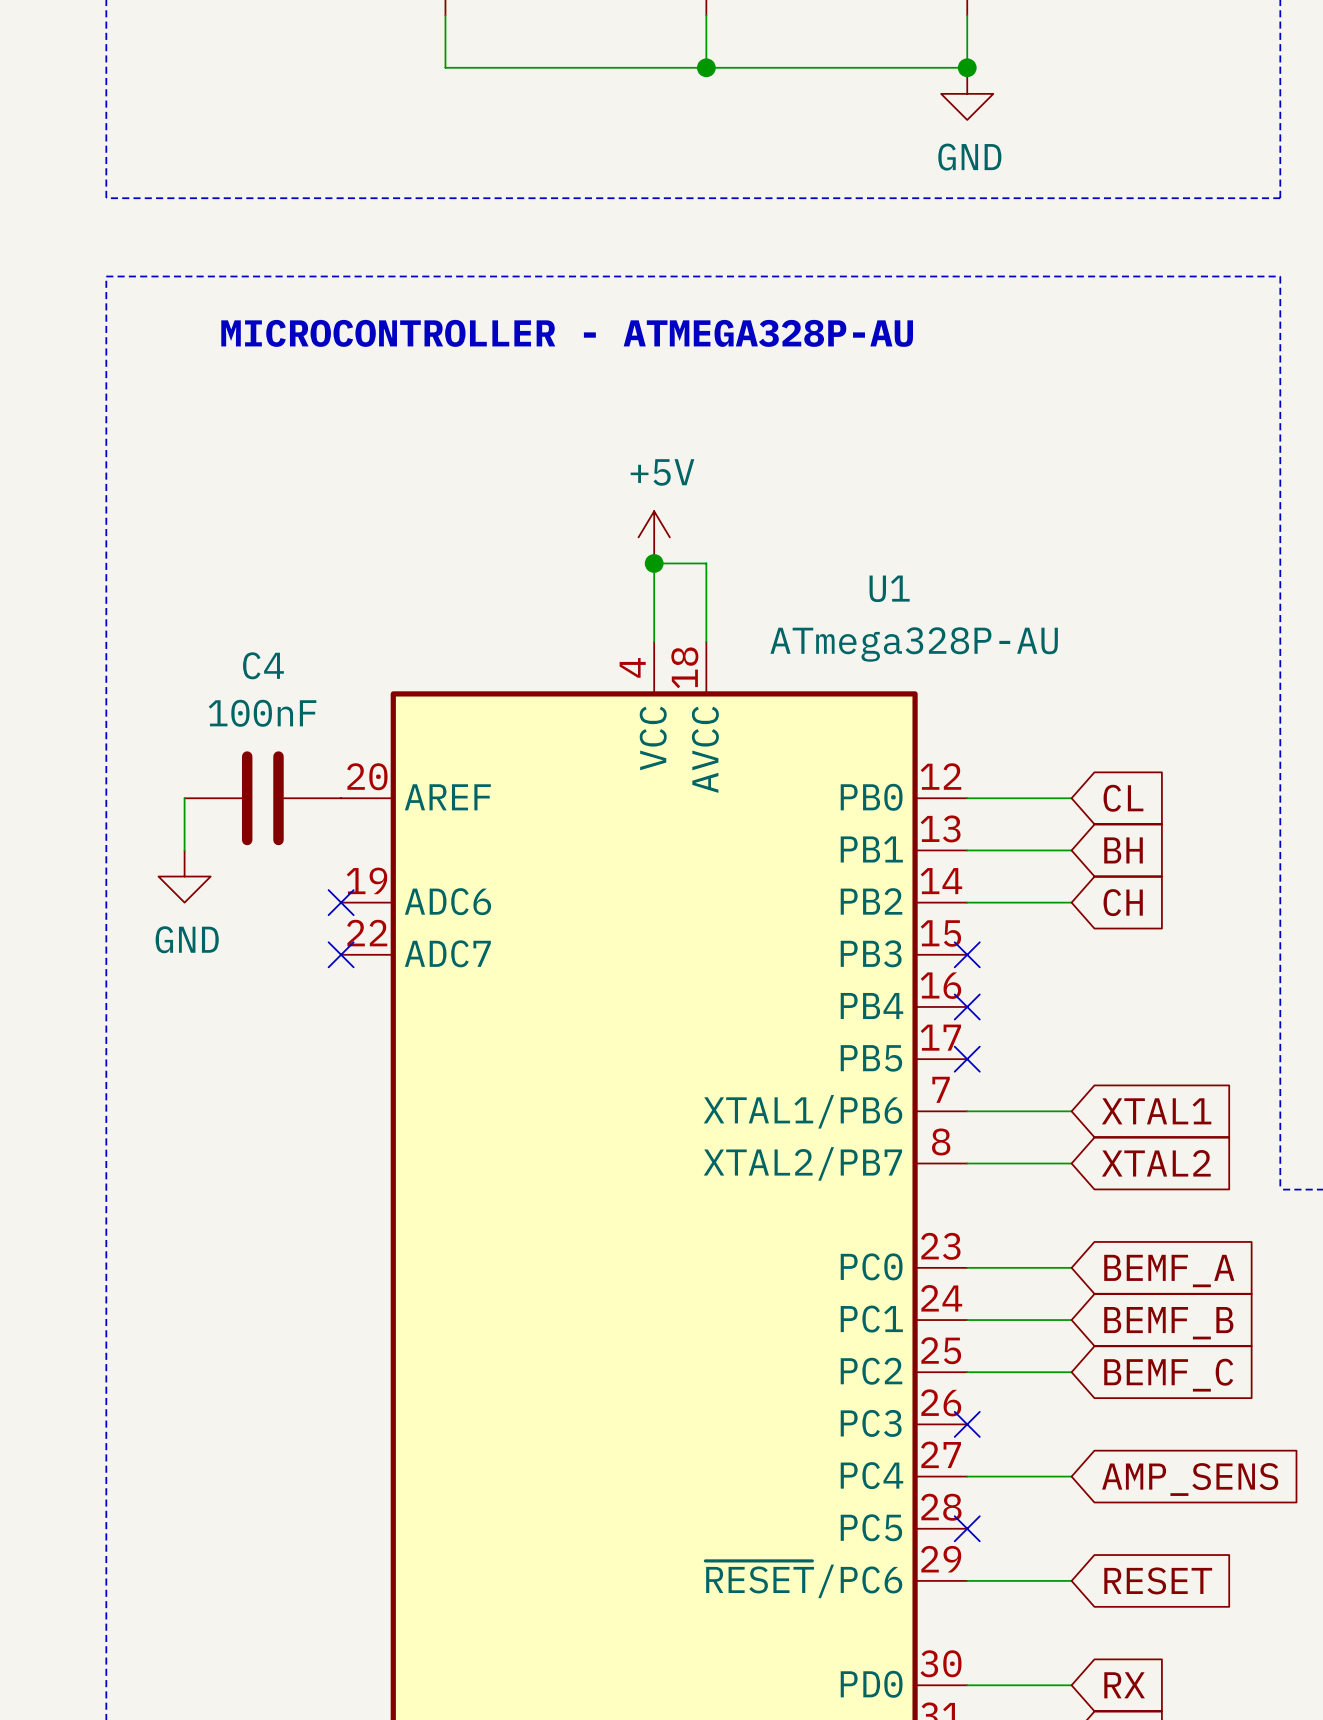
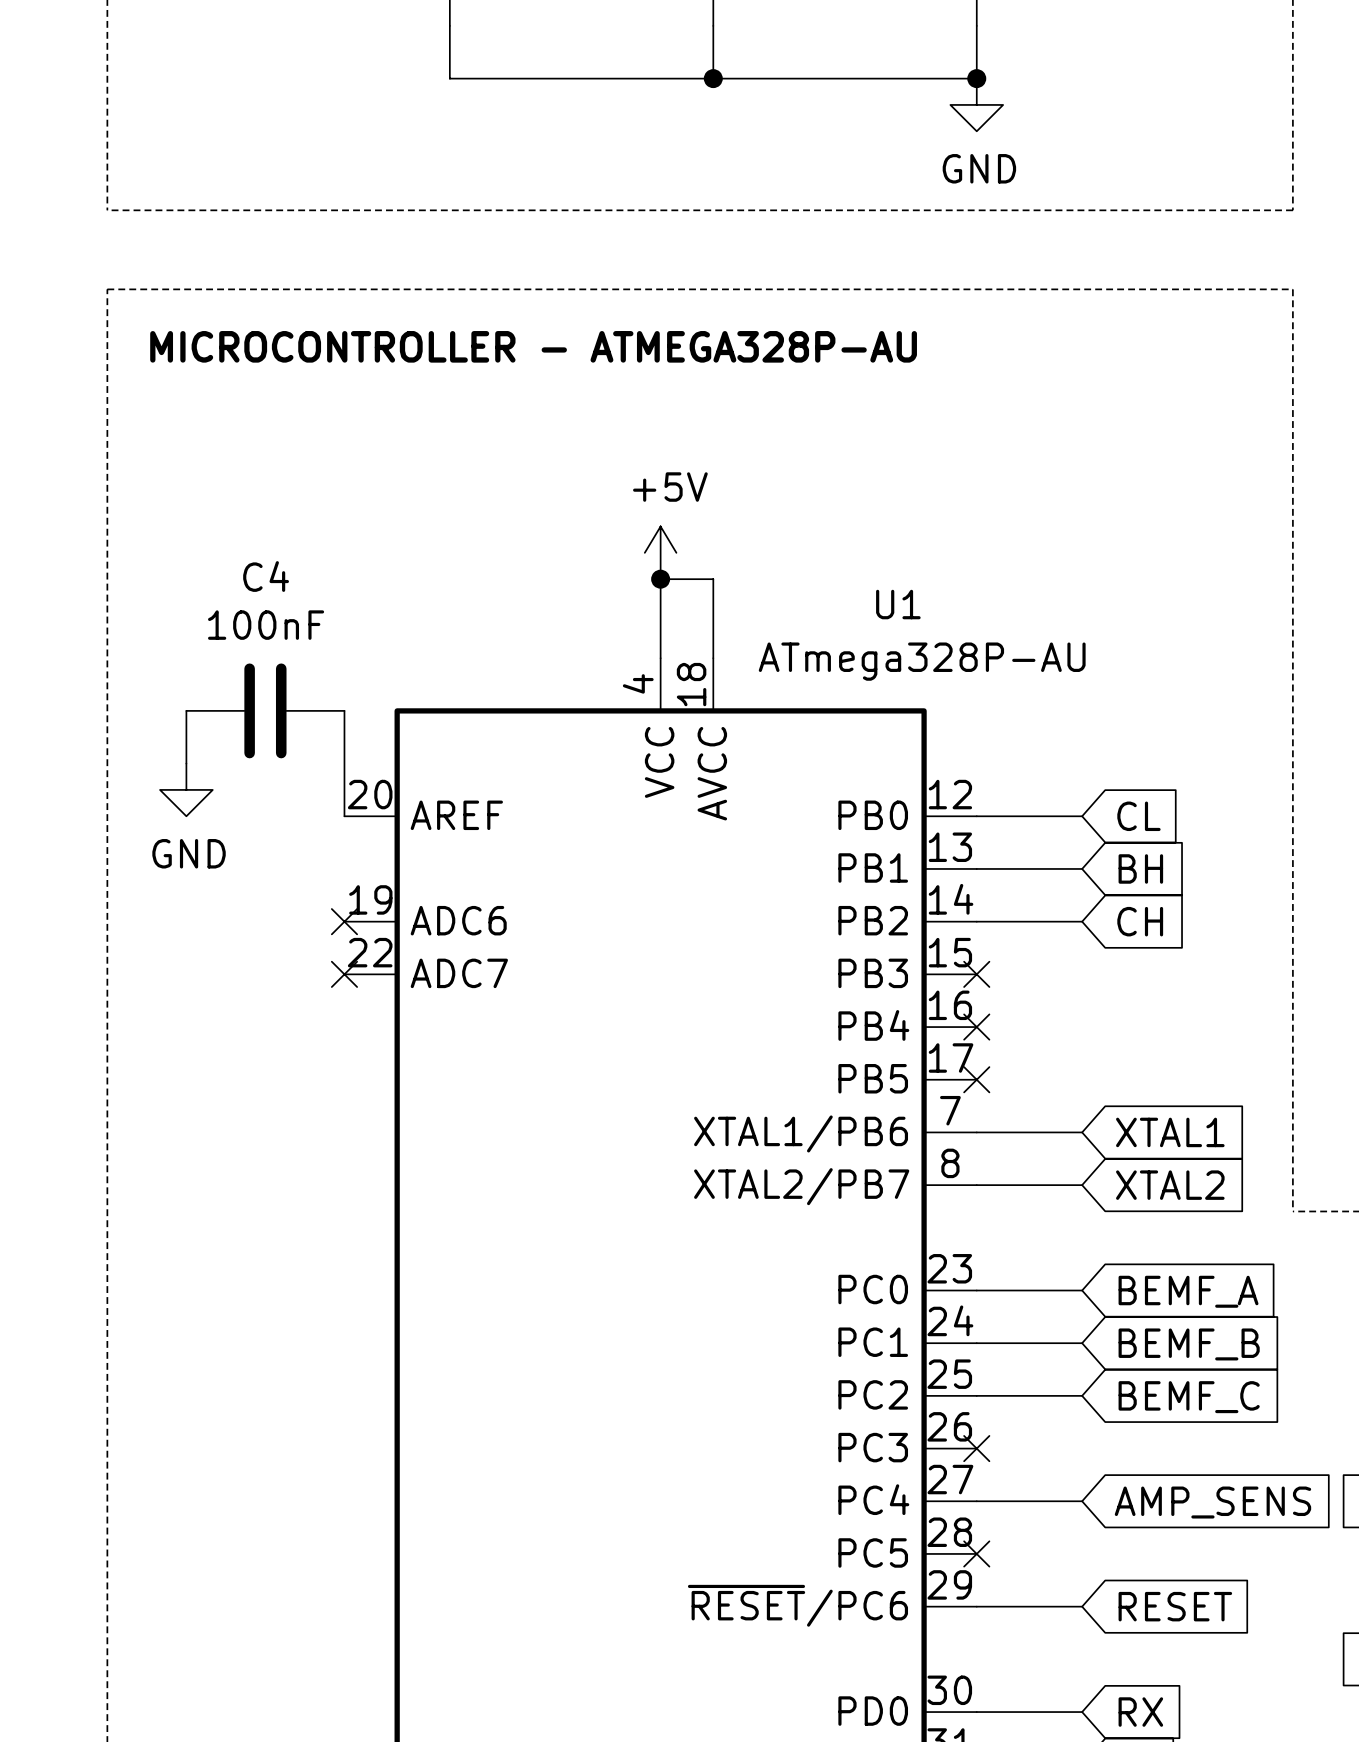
wire: none -> (344, 710) (344, 816)
wire: (184, 798) (184, 850) -> (186, 710) (186, 763)
C4 position: (262, 798) -> (265, 710)
power symbol position: GND (184, 876) -> GND (186, 789)

